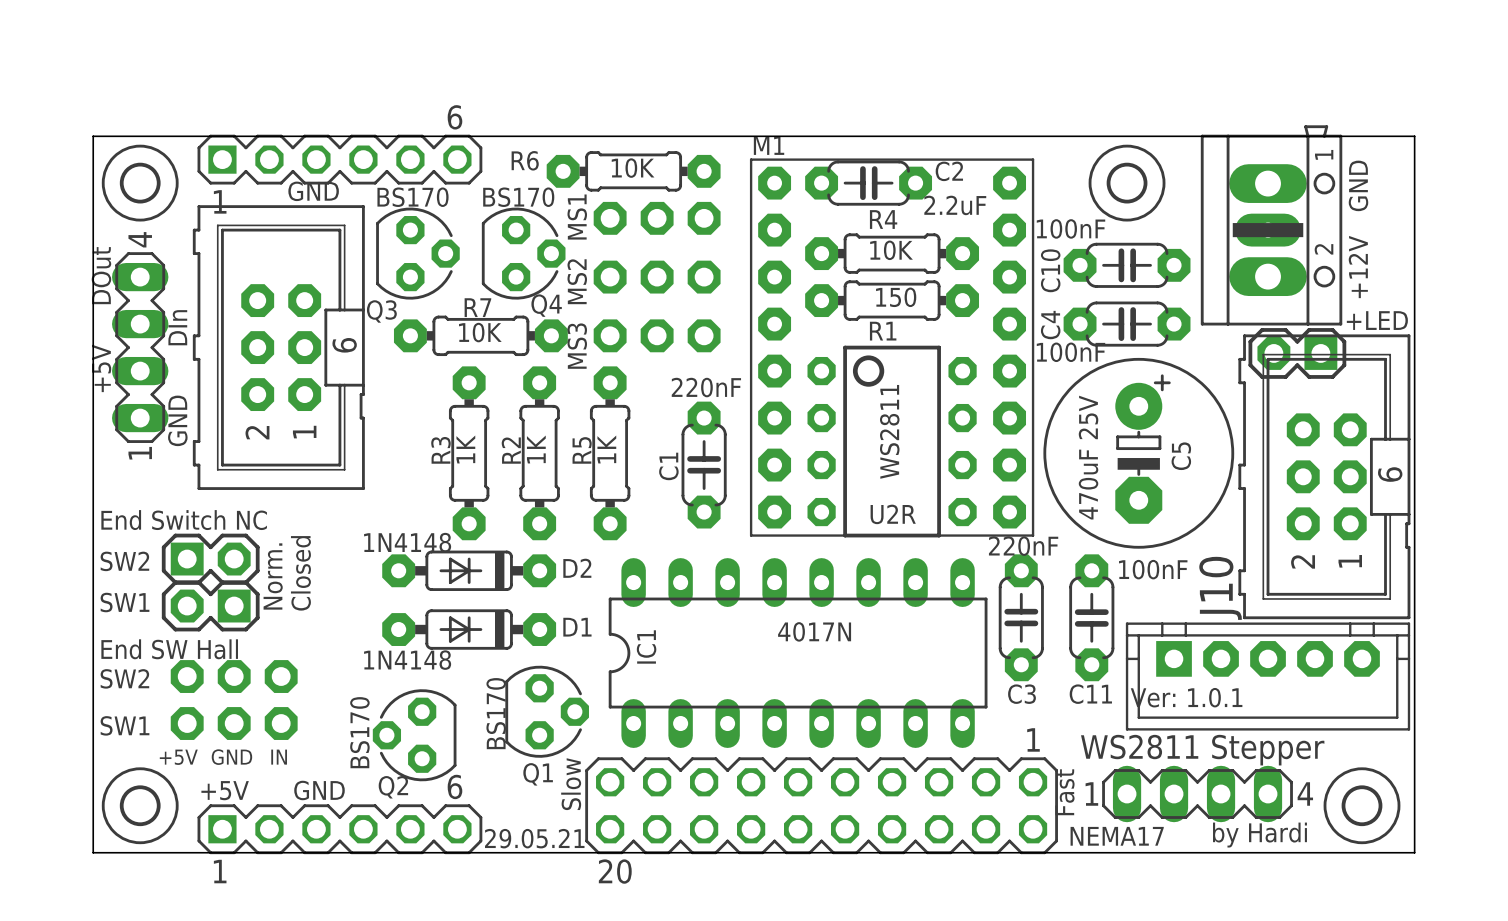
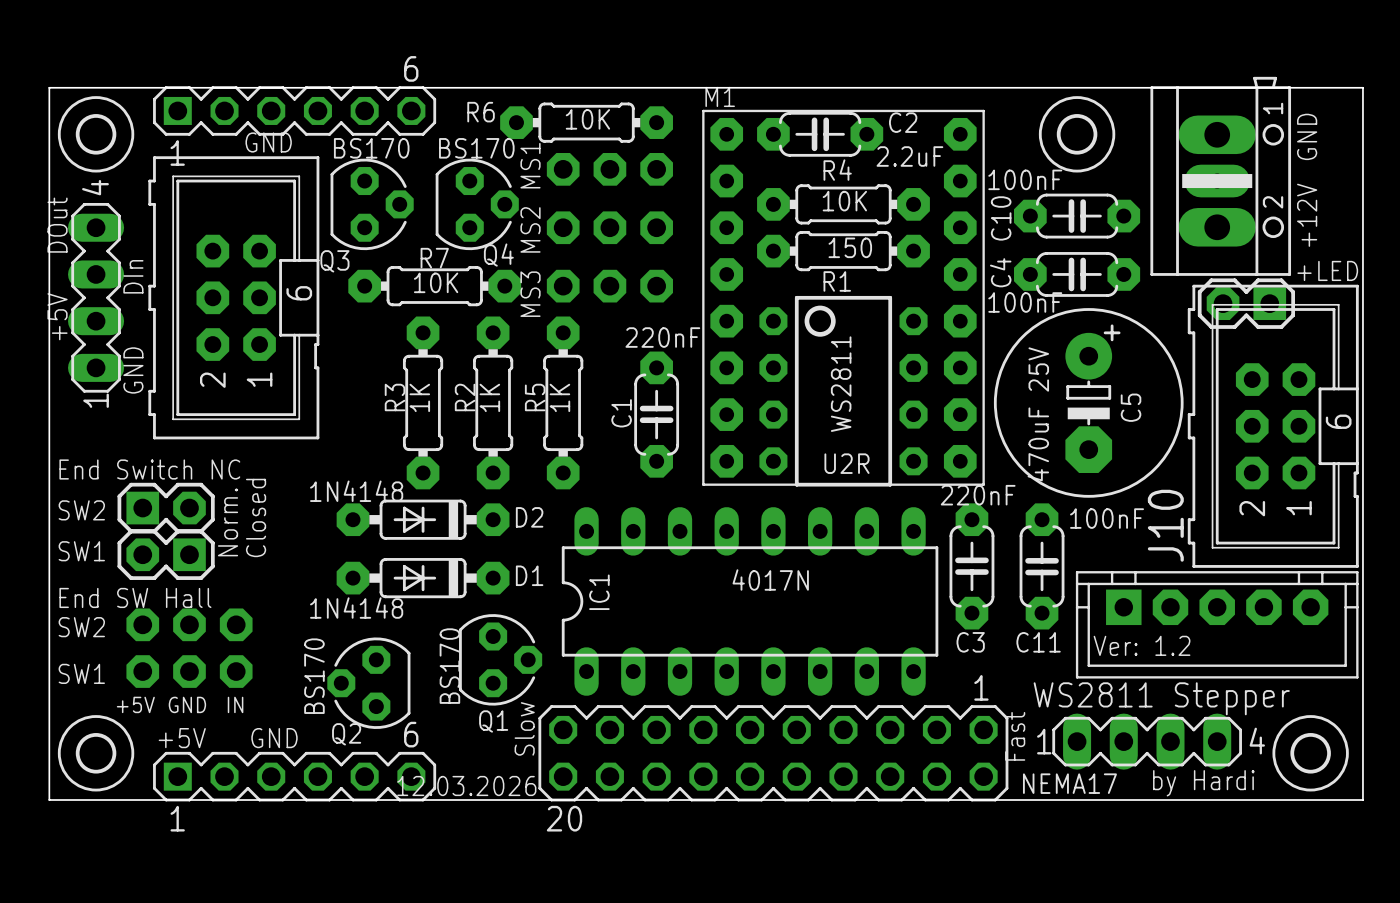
text: Ver: 1.0.1 (1186, 697) -> Ver: 1.2 (1142, 645)
text: 29.05.21 (534, 838) -> 12.03.2026 (466, 785)

